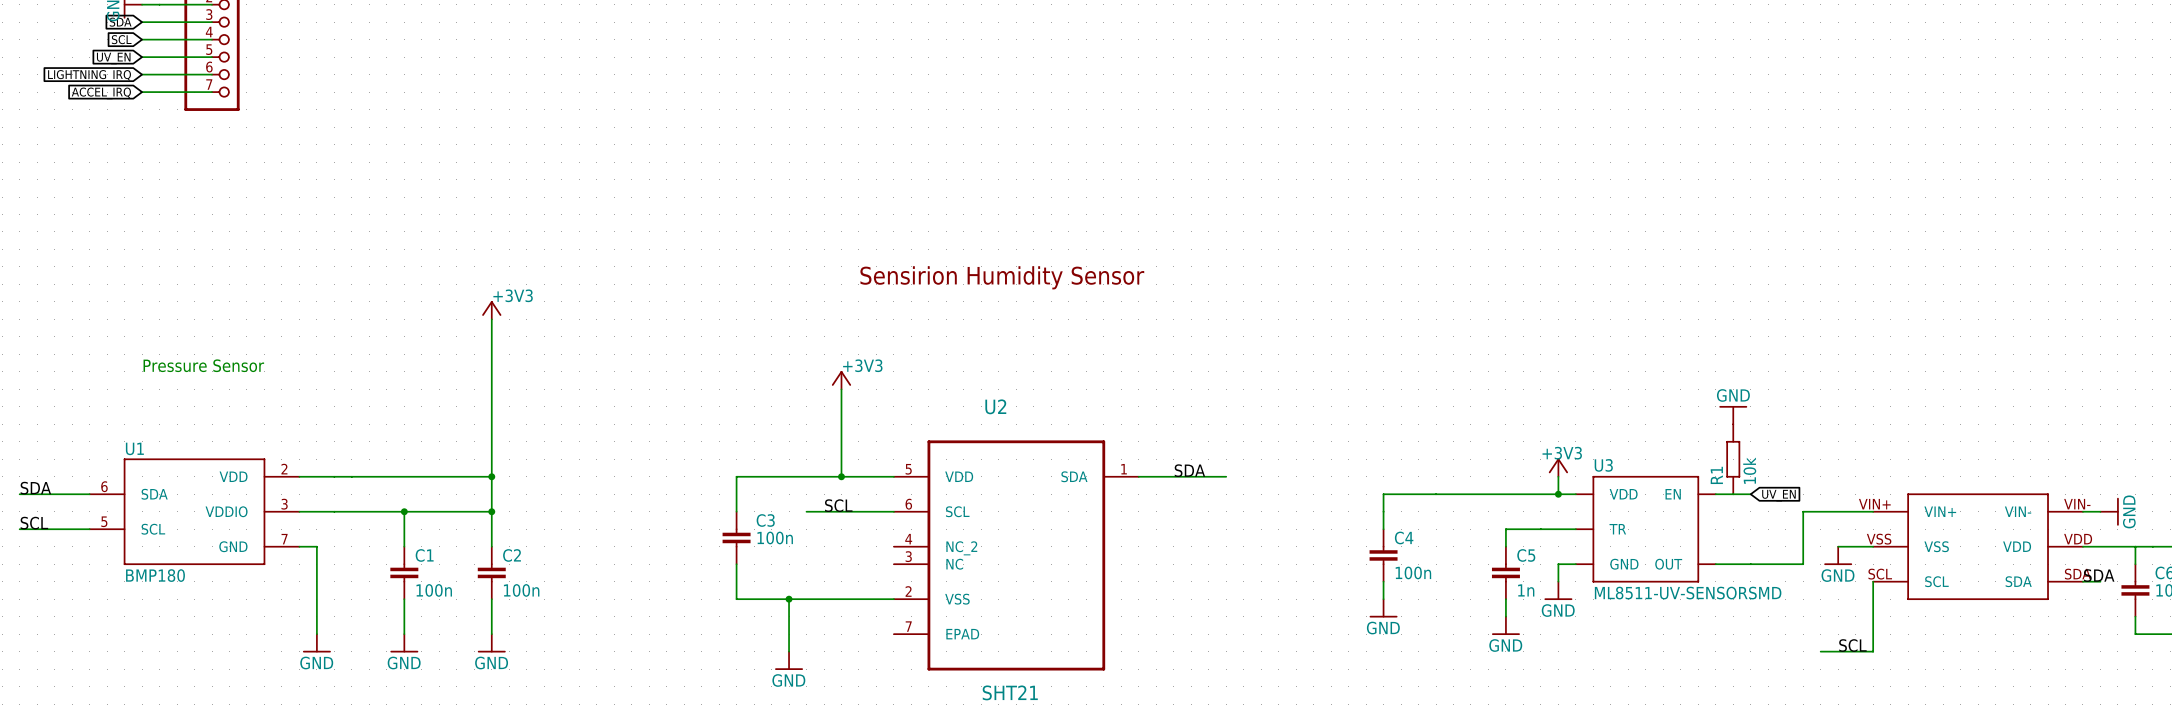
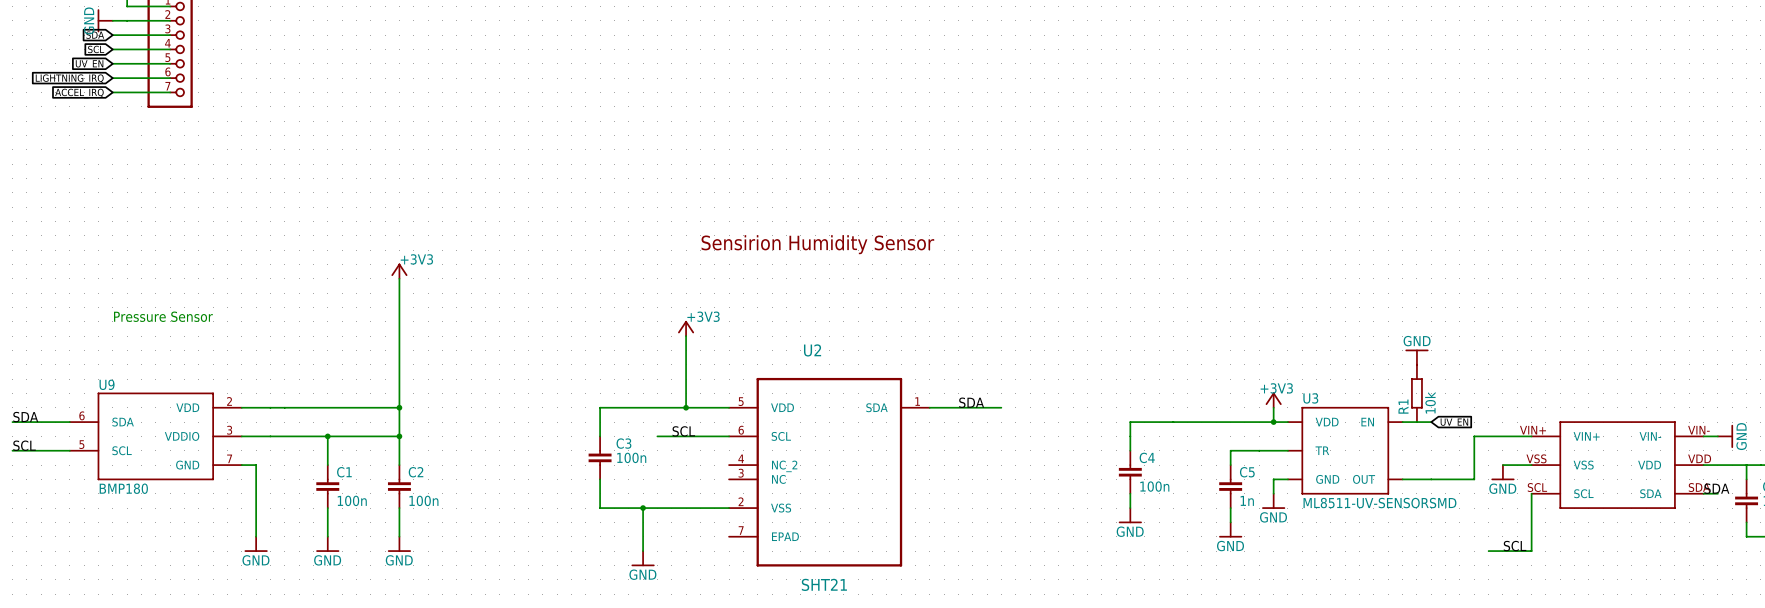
U1 name: U1 (134, 448) -> U9 (107, 384)

